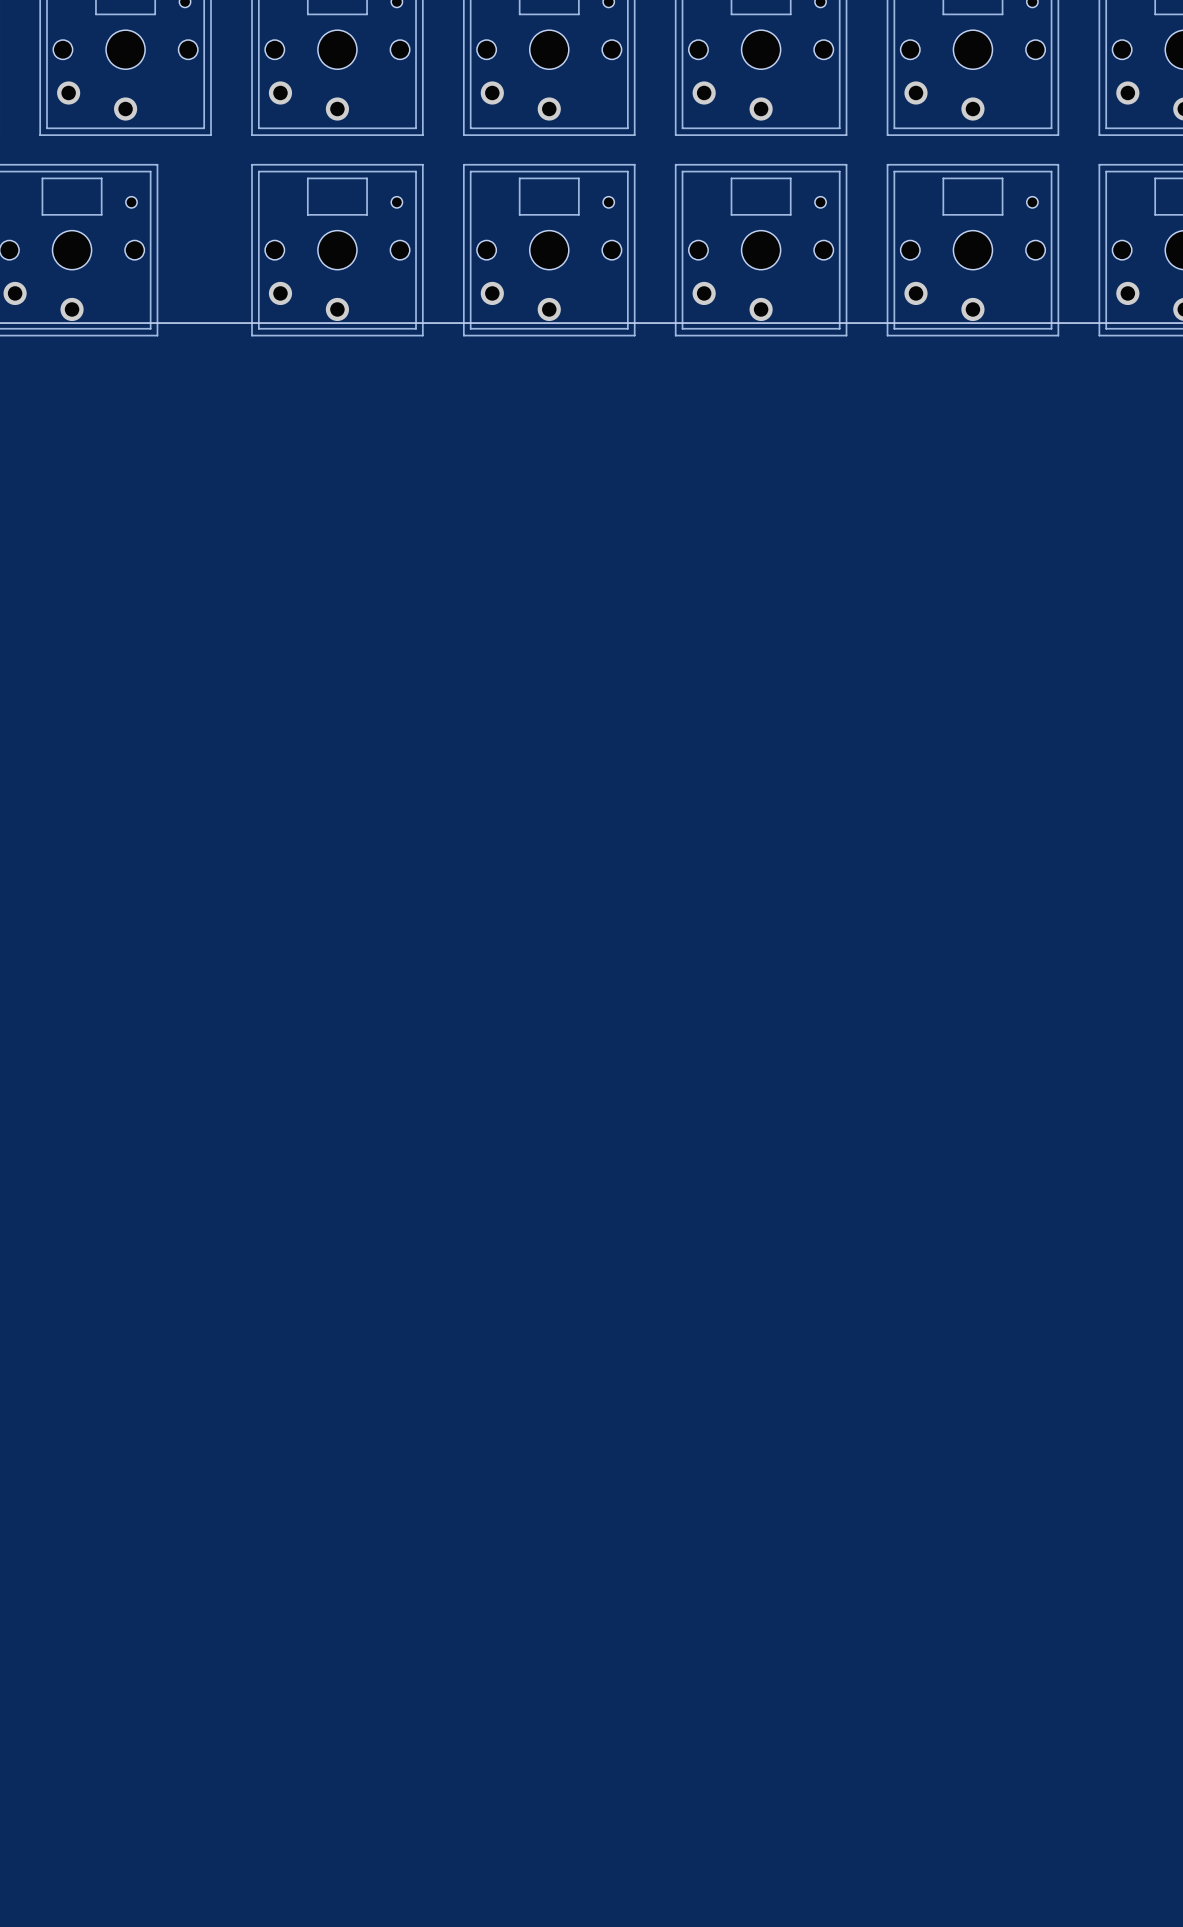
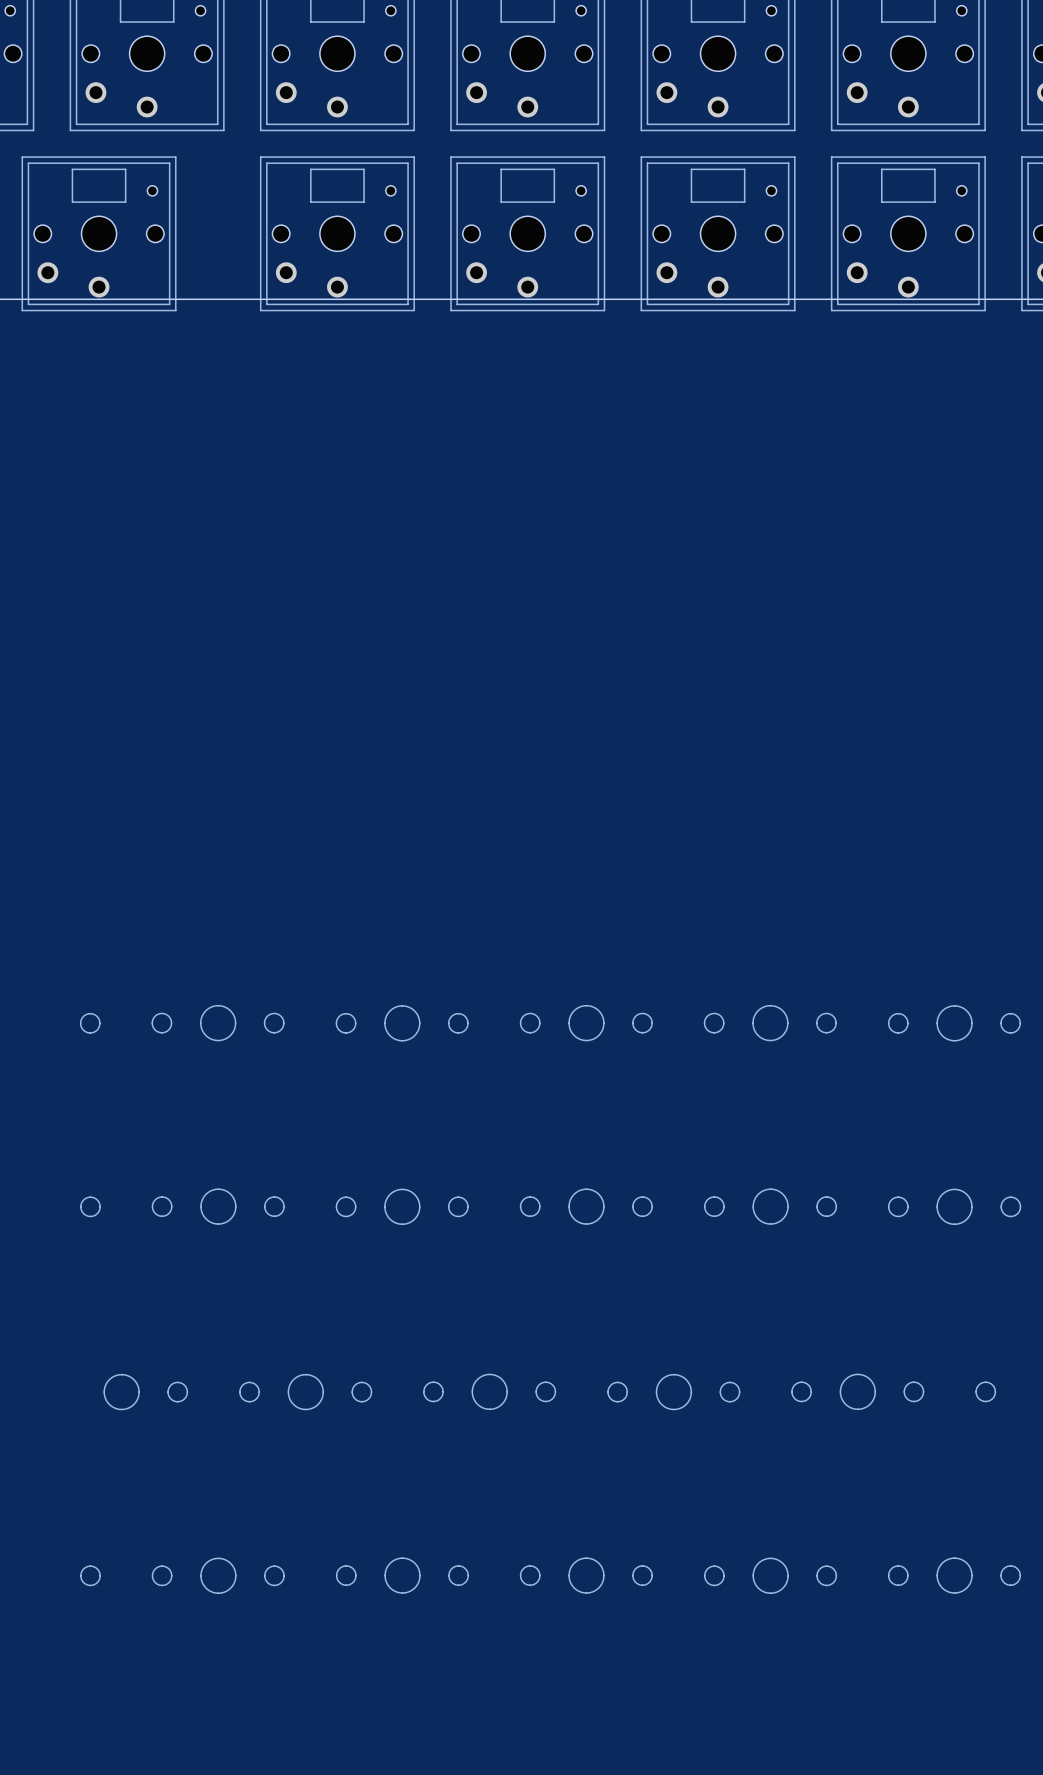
line: none -> (218, 1005) (230, 1010) (235, 1023) (230, 1035) (218, 1040) (205, 1035) (200, 1023) (205, 1010) (218, 1005)
line: none -> (402, 1005) (390, 1011) (384, 1023) (390, 1035) (402, 1040) (414, 1035) (419, 1023) (414, 1011) (402, 1005)
line: none -> (586, 1005) (574, 1010) (569, 1023) (574, 1035) (586, 1040) (598, 1035) (603, 1023) (598, 1010) (586, 1005)
line: none -> (770, 1005) (758, 1010) (753, 1023) (758, 1035) (770, 1040) (782, 1035) (787, 1023) (782, 1010) (770, 1005)
line: none -> (954, 1005) (966, 1011) (972, 1023) (966, 1035) (954, 1040) (942, 1035) (937, 1023) (942, 1011) (954, 1005)
line: none -> (90, 1013) (83, 1016) (80, 1023) (83, 1030) (90, 1032) (97, 1030) (99, 1023) (97, 1016) (90, 1013)
line: none -> (161, 1013) (155, 1016) (152, 1023) (155, 1029) (161, 1032) (168, 1029) (171, 1023) (168, 1016) (161, 1013)
line: none -> (274, 1013) (281, 1016) (283, 1023) (281, 1029) (274, 1032) (267, 1029) (264, 1023) (267, 1016) (274, 1013)
line: none -> (346, 1013) (339, 1016) (336, 1023) (339, 1030) (346, 1032) (352, 1030) (355, 1023) (352, 1016) (346, 1013)
line: none -> (458, 1013) (451, 1016) (448, 1023) (451, 1030) (458, 1032) (465, 1030) (468, 1023) (465, 1016) (458, 1013)
line: none -> (530, 1013) (523, 1016) (520, 1023) (523, 1029) (530, 1032) (537, 1029) (539, 1023) (537, 1016) (530, 1013)
line: none -> (642, 1013) (635, 1016) (632, 1023) (635, 1029) (642, 1032) (649, 1029) (652, 1023) (649, 1016) (642, 1013)
line: none -> (714, 1013) (707, 1016) (704, 1023) (707, 1029) (714, 1032) (720, 1029) (723, 1023) (720, 1016) (714, 1013)
line: none -> (826, 1013) (819, 1016) (816, 1023) (819, 1029) (826, 1032) (833, 1029) (836, 1023) (833, 1016) (826, 1013)
line: none -> (898, 1013) (905, 1016) (907, 1023) (905, 1030) (898, 1032) (891, 1030) (888, 1023) (891, 1016) (898, 1013)
line: none -> (1010, 1013) (1017, 1016) (1020, 1023) (1017, 1030) (1010, 1032) (1003, 1030) (1001, 1023) (1003, 1016) (1010, 1013)
line: none -> (218, 1189) (206, 1194) (200, 1206) (206, 1218) (218, 1224) (230, 1218) (235, 1206) (230, 1194) (218, 1189)
line: none -> (402, 1189) (390, 1194) (384, 1206) (390, 1219) (402, 1224) (414, 1219) (419, 1206) (414, 1194) (402, 1189)
line: none -> (586, 1189) (574, 1194) (569, 1206) (574, 1218) (586, 1224) (598, 1218) (603, 1206) (598, 1194) (586, 1189)
line: none -> (770, 1189) (758, 1194) (753, 1206) (758, 1218) (770, 1224) (782, 1218) (788, 1206) (782, 1194) (770, 1189)
line: none -> (954, 1189) (942, 1194) (937, 1206) (942, 1219) (954, 1224) (966, 1219) (972, 1206) (966, 1194) (954, 1189)
line: none -> (90, 1197) (83, 1200) (80, 1206) (83, 1213) (90, 1216) (97, 1213) (100, 1206) (97, 1200) (90, 1197)
line: none -> (162, 1196) (155, 1199) (152, 1206) (155, 1213) (162, 1216) (168, 1213) (171, 1206) (168, 1199) (162, 1196)
line: none -> (274, 1196) (267, 1199) (264, 1206) (267, 1213) (274, 1216) (281, 1213) (284, 1206) (281, 1199) (274, 1196)
line: none -> (346, 1197) (339, 1200) (336, 1206) (339, 1213) (346, 1216) (352, 1213) (355, 1206) (352, 1200) (346, 1197)
line: none -> (458, 1197) (451, 1200) (448, 1206) (451, 1213) (458, 1216) (465, 1213) (468, 1206) (465, 1200) (458, 1197)
line: none -> (530, 1196) (523, 1199) (520, 1206) (523, 1213) (530, 1216) (537, 1213) (539, 1206) (537, 1199) (530, 1196)
line: none -> (642, 1196) (635, 1199) (632, 1206) (635, 1213) (642, 1216) (649, 1213) (652, 1206) (649, 1199) (642, 1196)
line: none -> (714, 1196) (721, 1199) (724, 1206) (721, 1213) (714, 1216) (707, 1213) (704, 1206) (707, 1199) (714, 1196)
line: none -> (826, 1196) (833, 1199) (836, 1206) (833, 1213) (826, 1216) (819, 1213) (817, 1206) (819, 1199) (826, 1196)
line: none -> (898, 1197) (891, 1200) (888, 1206) (891, 1213) (898, 1216) (905, 1213) (907, 1206) (905, 1200) (898, 1197)
line: none -> (1010, 1197) (1004, 1200) (1001, 1206) (1004, 1213) (1010, 1216) (1017, 1213) (1020, 1206) (1017, 1200) (1010, 1197)
line: none -> (489, 1374) (477, 1379) (472, 1391) (477, 1404) (489, 1409) (502, 1404) (507, 1391) (502, 1379) (489, 1374)
line: none -> (857, 1374) (845, 1379) (840, 1391) (845, 1404) (857, 1409) (870, 1404) (875, 1391) (870, 1379) (857, 1374)
line: none -> (121, 1374) (109, 1379) (104, 1392) (109, 1404) (121, 1409) (133, 1404) (139, 1392) (133, 1379) (121, 1374)
line: none -> (305, 1374) (293, 1379) (288, 1392) (293, 1404) (305, 1409) (318, 1404) (323, 1392) (318, 1379) (305, 1374)
line: none -> (673, 1374) (661, 1379) (656, 1392) (661, 1404) (673, 1409) (686, 1404) (691, 1392) (686, 1379) (673, 1374)
line: none -> (177, 1382) (184, 1385) (187, 1392) (184, 1398) (177, 1401) (170, 1398) (168, 1392) (170, 1385) (177, 1382)
line: none -> (249, 1382) (242, 1385) (239, 1392) (242, 1398) (249, 1401) (256, 1398) (259, 1392) (256, 1385) (249, 1382)
line: none -> (361, 1382) (355, 1385) (352, 1392) (355, 1398) (361, 1401) (368, 1398) (371, 1392) (368, 1385) (361, 1382)
line: none -> (433, 1382) (426, 1385) (423, 1391) (426, 1398) (433, 1401) (440, 1398) (443, 1391) (440, 1385) (433, 1382)
line: none -> (545, 1382) (538, 1385) (536, 1391) (538, 1398) (545, 1401) (552, 1398) (555, 1391) (552, 1385) (545, 1382)
line: none -> (617, 1382) (610, 1385) (608, 1392) (610, 1398) (617, 1401) (624, 1398) (627, 1392) (624, 1385) (617, 1382)
line: none -> (729, 1382) (723, 1385) (720, 1392) (723, 1398) (729, 1401) (736, 1398) (739, 1392) (736, 1385) (729, 1382)
line: none -> (801, 1382) (794, 1385) (791, 1391) (794, 1398) (801, 1401) (808, 1398) (811, 1391) (808, 1385) (801, 1382)
line: none -> (913, 1382) (920, 1385) (923, 1391) (920, 1398) (913, 1401) (907, 1398) (904, 1391) (907, 1385) (913, 1382)
line: none -> (985, 1382) (978, 1385) (976, 1391) (978, 1398) (985, 1401) (992, 1398) (995, 1391) (992, 1385) (985, 1382)
line: none -> (218, 1558) (230, 1563) (235, 1575) (230, 1588) (218, 1593) (206, 1588) (200, 1575) (206, 1563) (218, 1558)
line: none -> (402, 1558) (390, 1563) (385, 1575) (390, 1587) (402, 1593) (414, 1587) (419, 1575) (414, 1563) (402, 1558)
line: none -> (586, 1558) (574, 1563) (569, 1575) (574, 1587) (586, 1593) (598, 1587) (603, 1575) (598, 1563) (586, 1558)
line: none -> (770, 1558) (758, 1563) (753, 1575) (758, 1588) (770, 1593) (782, 1588) (788, 1575) (782, 1563) (770, 1558)
line: none -> (954, 1558) (942, 1563) (937, 1575) (942, 1587) (954, 1593) (966, 1587) (972, 1575) (966, 1563) (954, 1558)
line: none -> (90, 1566) (83, 1568) (80, 1575) (83, 1582) (90, 1585) (97, 1582) (100, 1575) (97, 1568) (90, 1566)
line: none -> (162, 1566) (168, 1568) (171, 1575) (168, 1582) (162, 1585) (155, 1582) (152, 1575) (155, 1568) (162, 1566)
line: none -> (274, 1566) (281, 1568) (284, 1575) (281, 1582) (274, 1585) (267, 1582) (264, 1575) (267, 1568) (274, 1566)
line: none -> (346, 1565) (353, 1568) (355, 1575) (353, 1582) (346, 1585) (339, 1582) (336, 1575) (339, 1568) (346, 1565)
line: none -> (458, 1565) (465, 1568) (468, 1575) (465, 1582) (458, 1585) (451, 1582) (448, 1575) (451, 1568) (458, 1565)
line: none -> (530, 1565) (523, 1568) (520, 1575) (523, 1582) (530, 1585) (537, 1582) (539, 1575) (537, 1568) (530, 1565)
line: none -> (642, 1565) (649, 1568) (652, 1575) (649, 1582) (642, 1585) (635, 1582) (632, 1575) (635, 1568) (642, 1565)
line: none -> (714, 1566) (721, 1568) (724, 1575) (721, 1582) (714, 1585) (707, 1582) (704, 1575) (707, 1568) (714, 1566)
line: none -> (826, 1566) (819, 1568) (817, 1575) (819, 1582) (826, 1585) (833, 1582) (836, 1575) (833, 1568) (826, 1566)
line: none -> (898, 1565) (891, 1568) (888, 1575) (891, 1582) (898, 1585) (905, 1582) (907, 1575) (905, 1568) (898, 1565)
line: none -> (1010, 1565) (1017, 1568) (1020, 1575) (1017, 1582) (1010, 1585) (1003, 1582) (1001, 1575) (1003, 1568) (1010, 1565)

